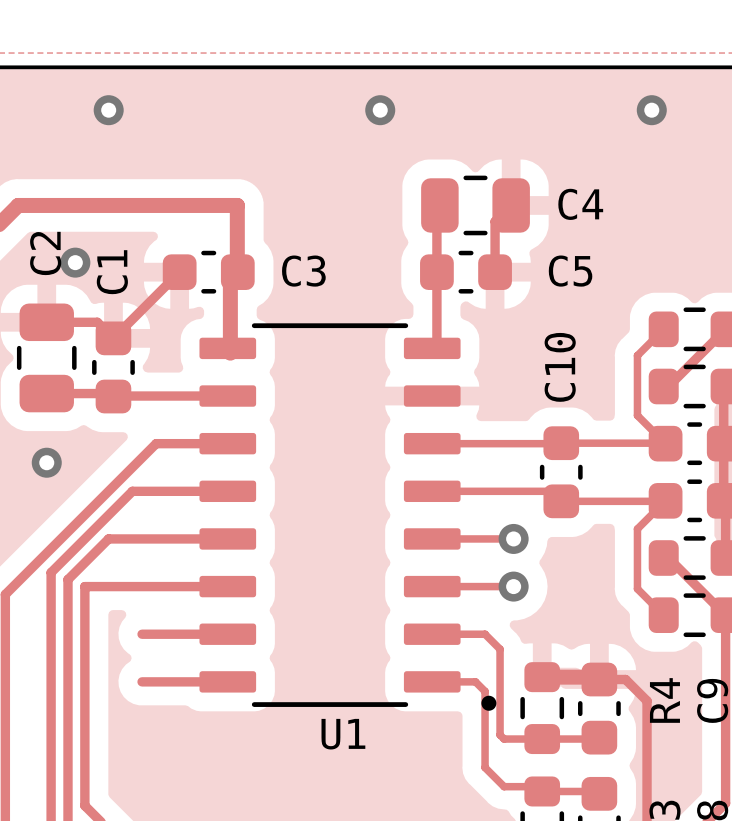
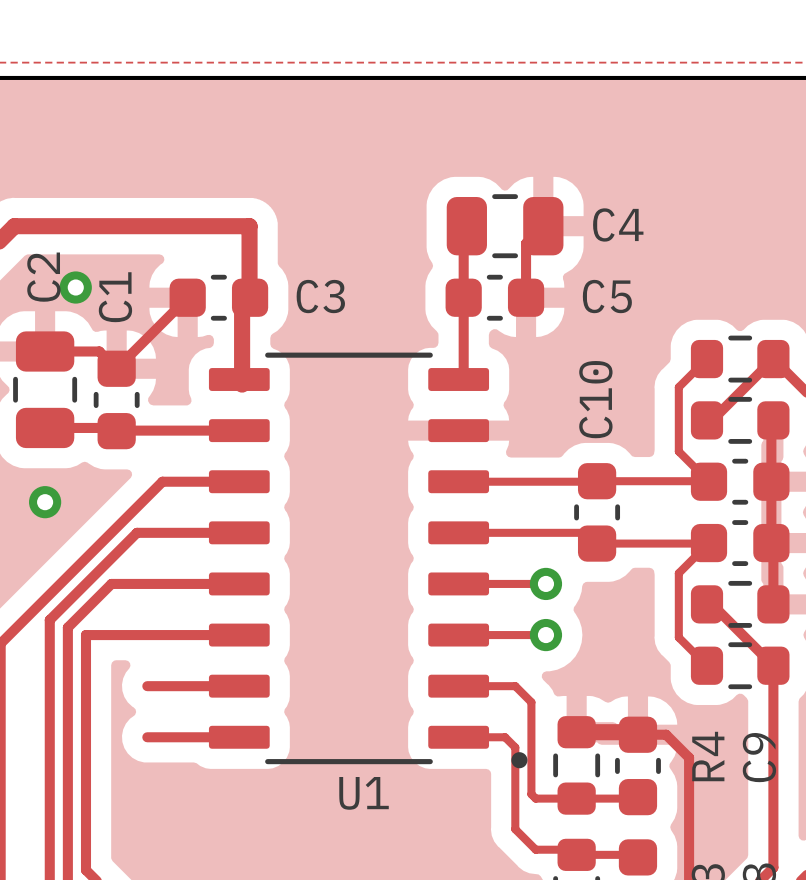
via: (108, 110) -> none
via: (380, 110) -> none
via: (651, 110) -> none

